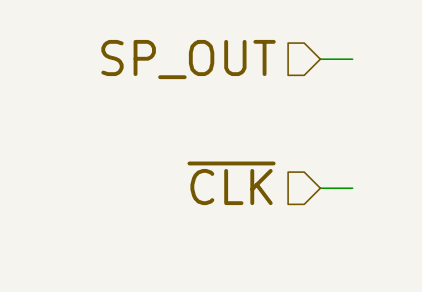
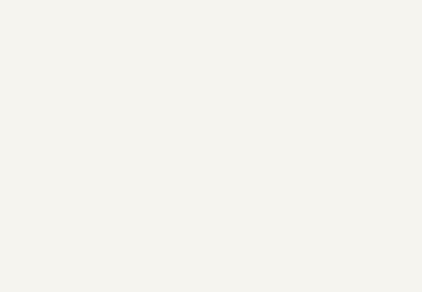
hierarchical label: SP_OUT (188, 59) -> none
wire: (320, 59) (352, 59) -> none
hierarchical label: ~{CLK} (231, 183) -> none
wire: (320, 188) (352, 188) -> none

